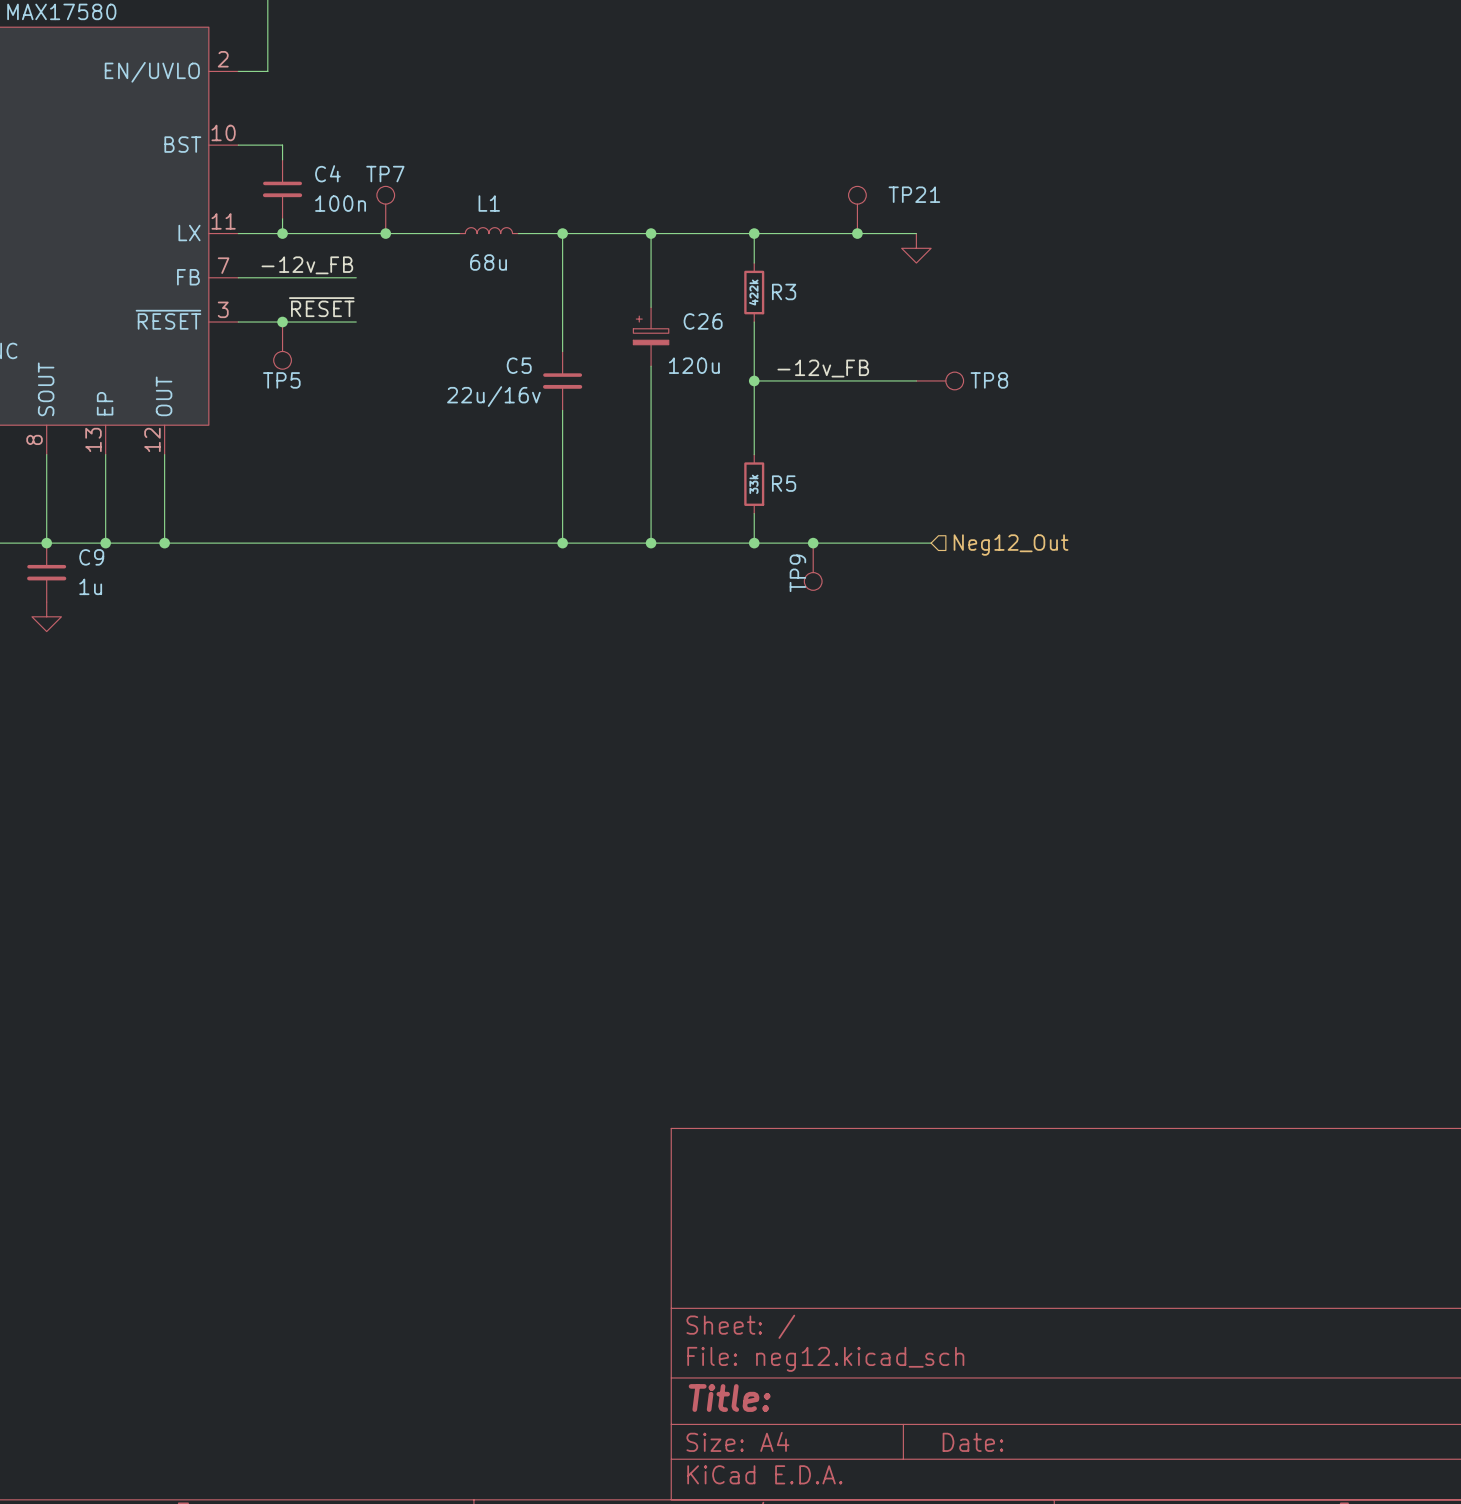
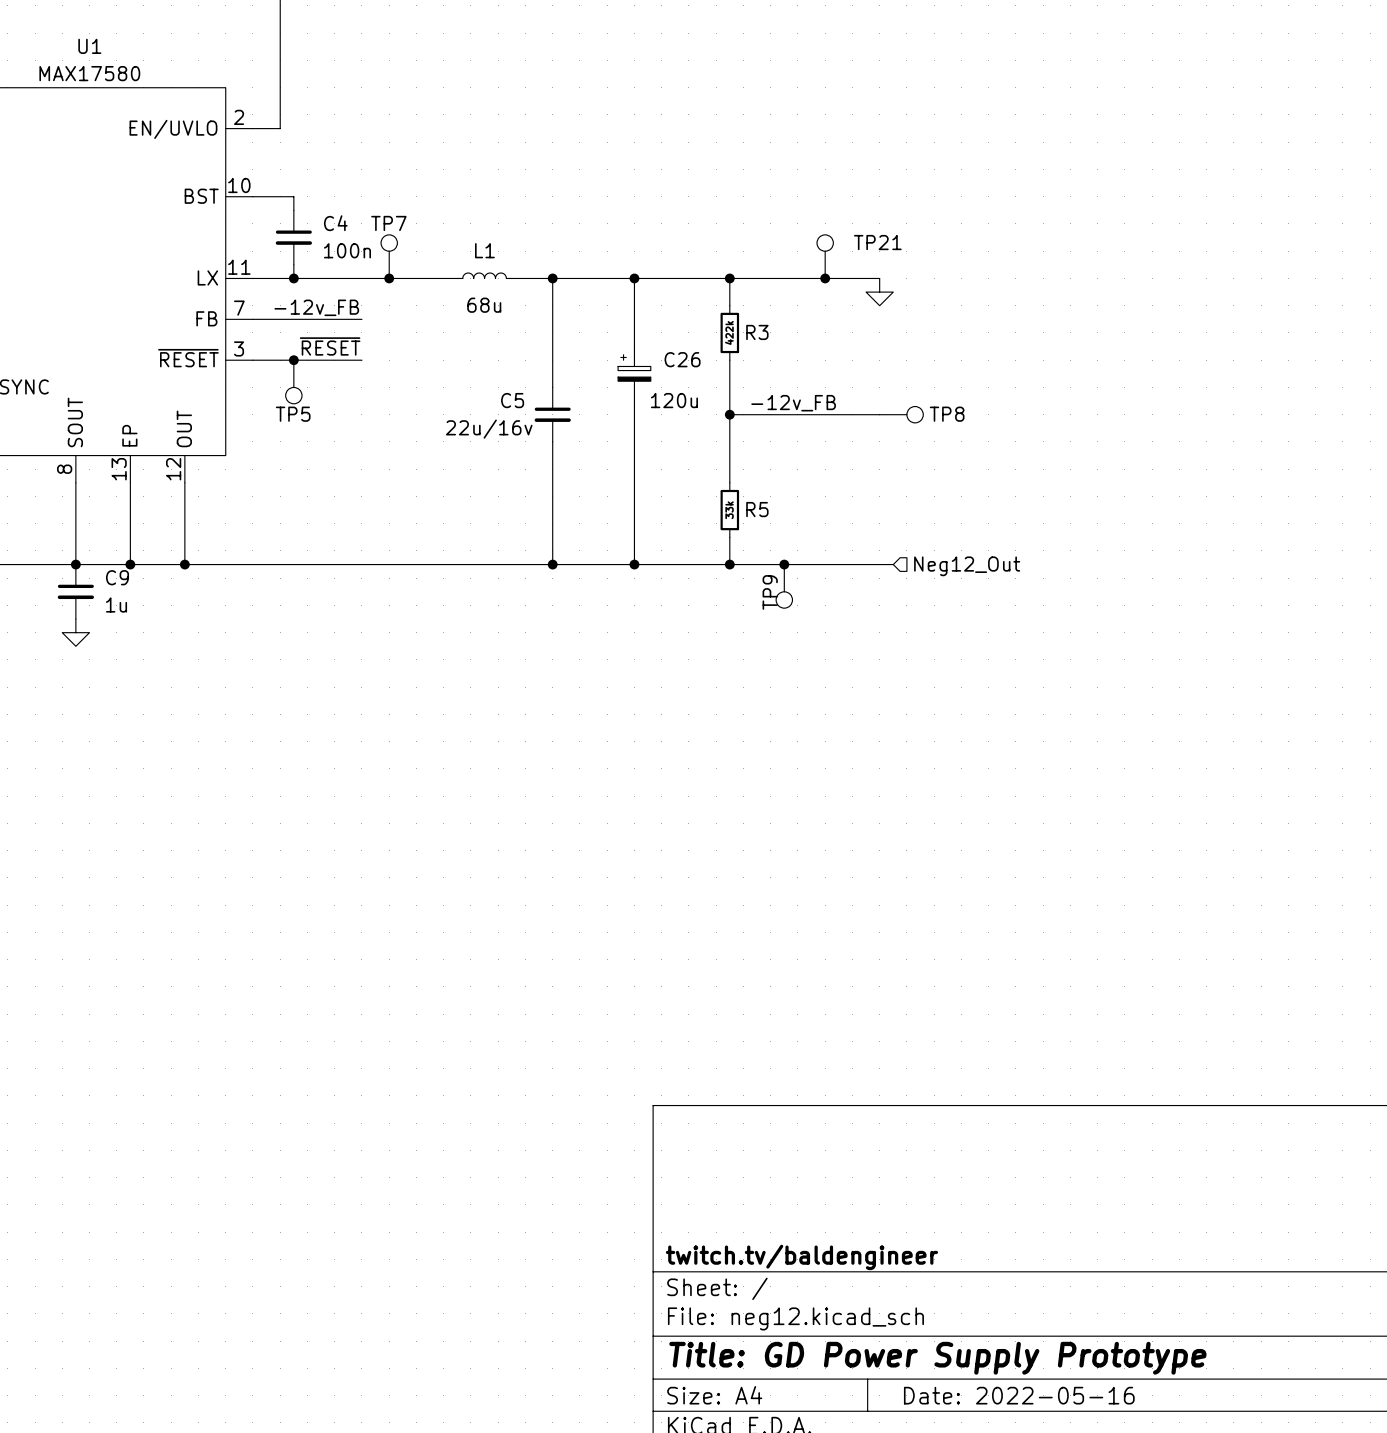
title block: none -> twitch.tv/baldengineer (801, 1257)
title block: Title: (729, 1398) -> Title: GD Power Supply Prototype (937, 1358)
title block: Date: (972, 1442) -> Date: 2022-05-16 (1019, 1395)

